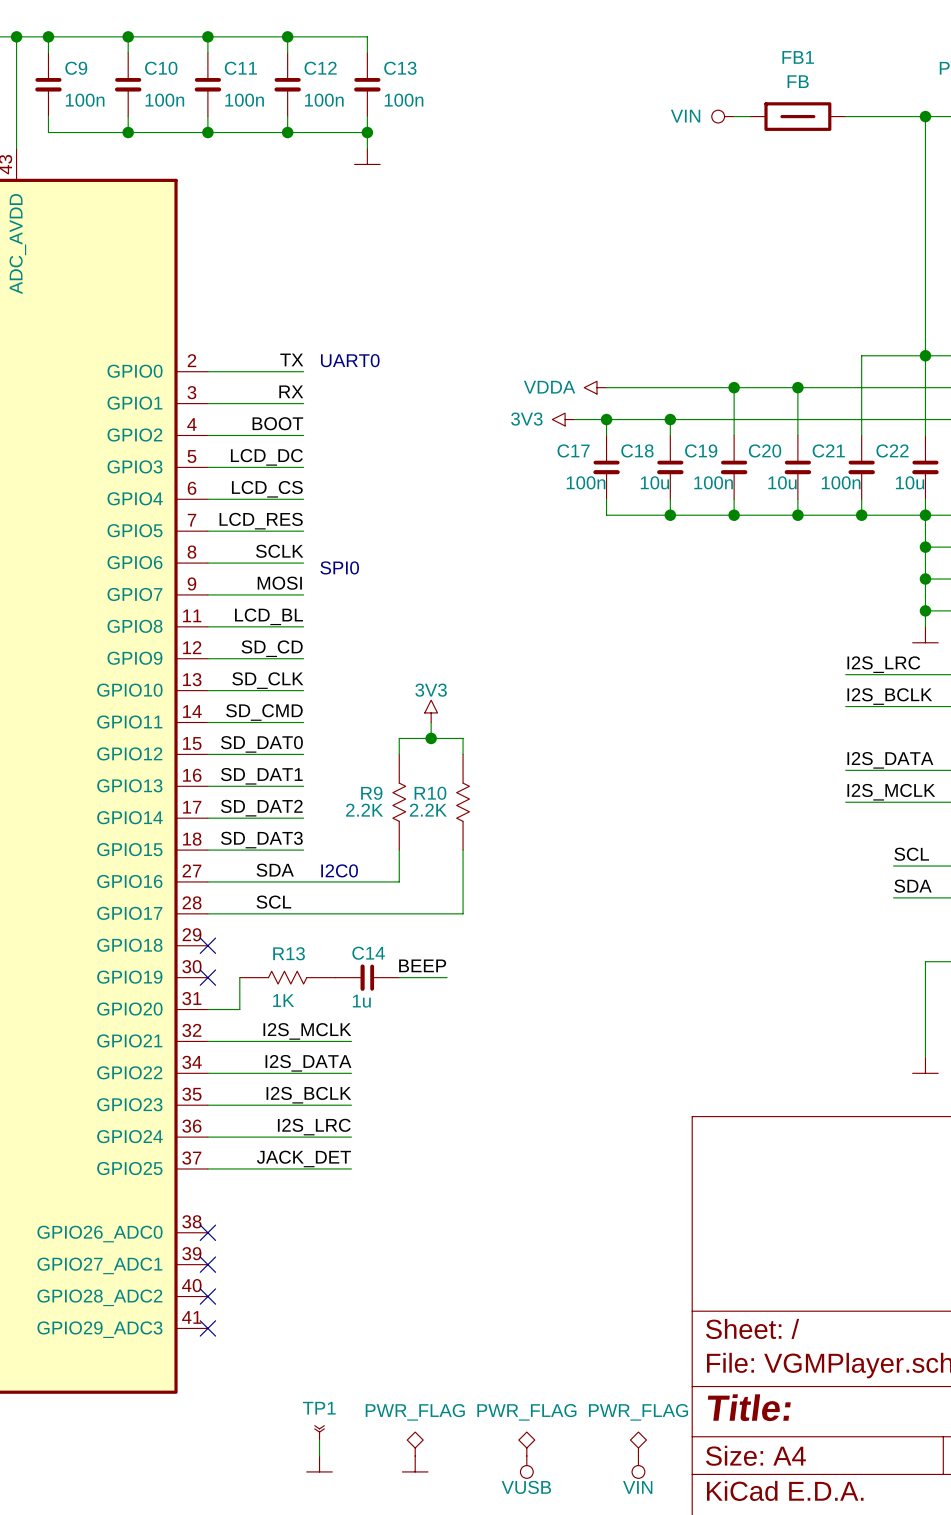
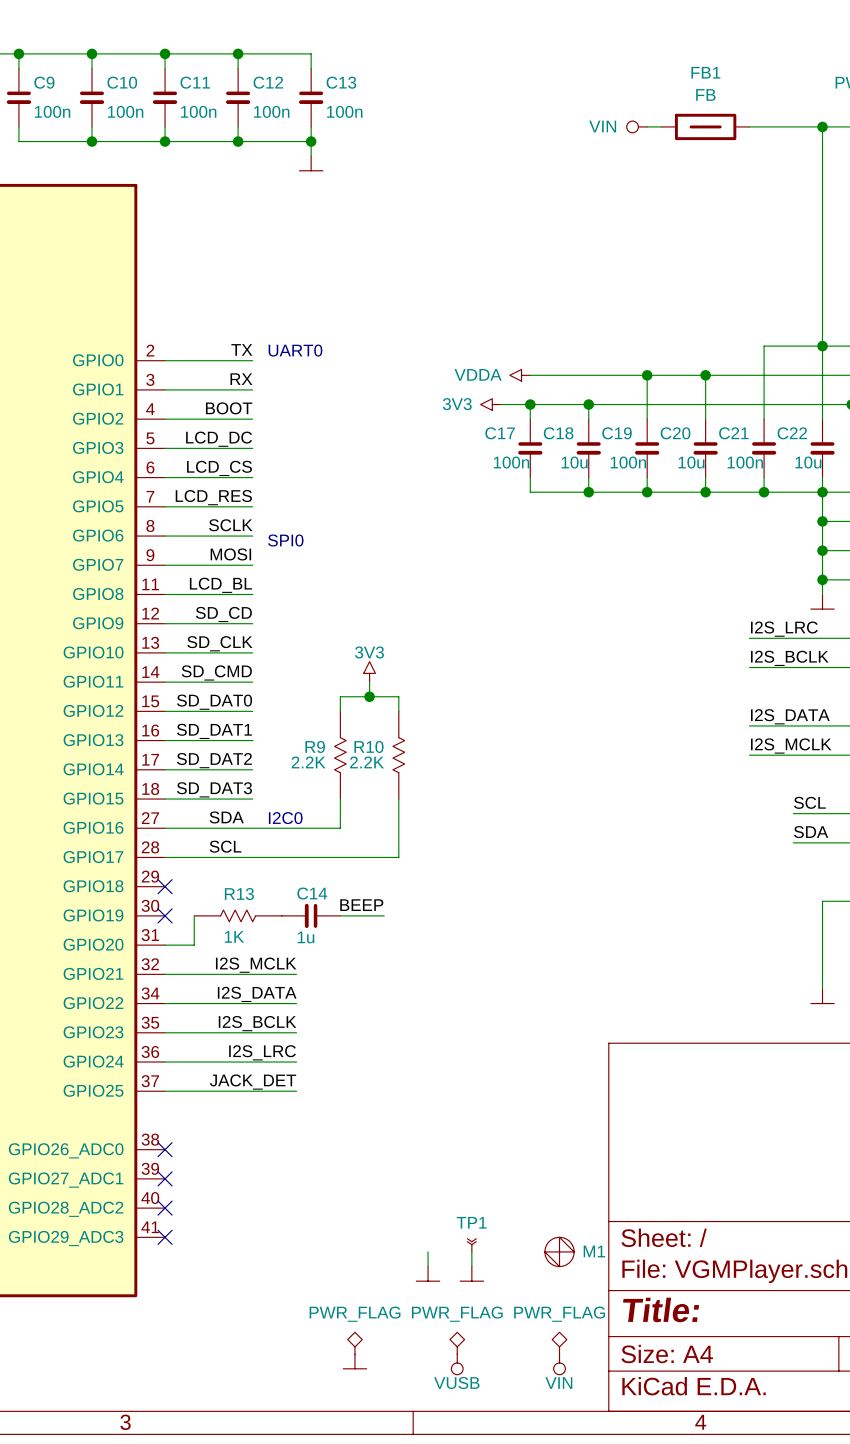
wire: none -> (471, 1251) (471, 1266)
M1: none -> (559, 1251)
power symbol: none -> (428, 1273)
power symbol: none -> (471, 1273)
TP1 position: (319, 1432) -> (471, 1245)
wire: (319, 1440) (319, 1456) -> (428, 1251) (428, 1266)
power symbol: (319, 1463) -> none

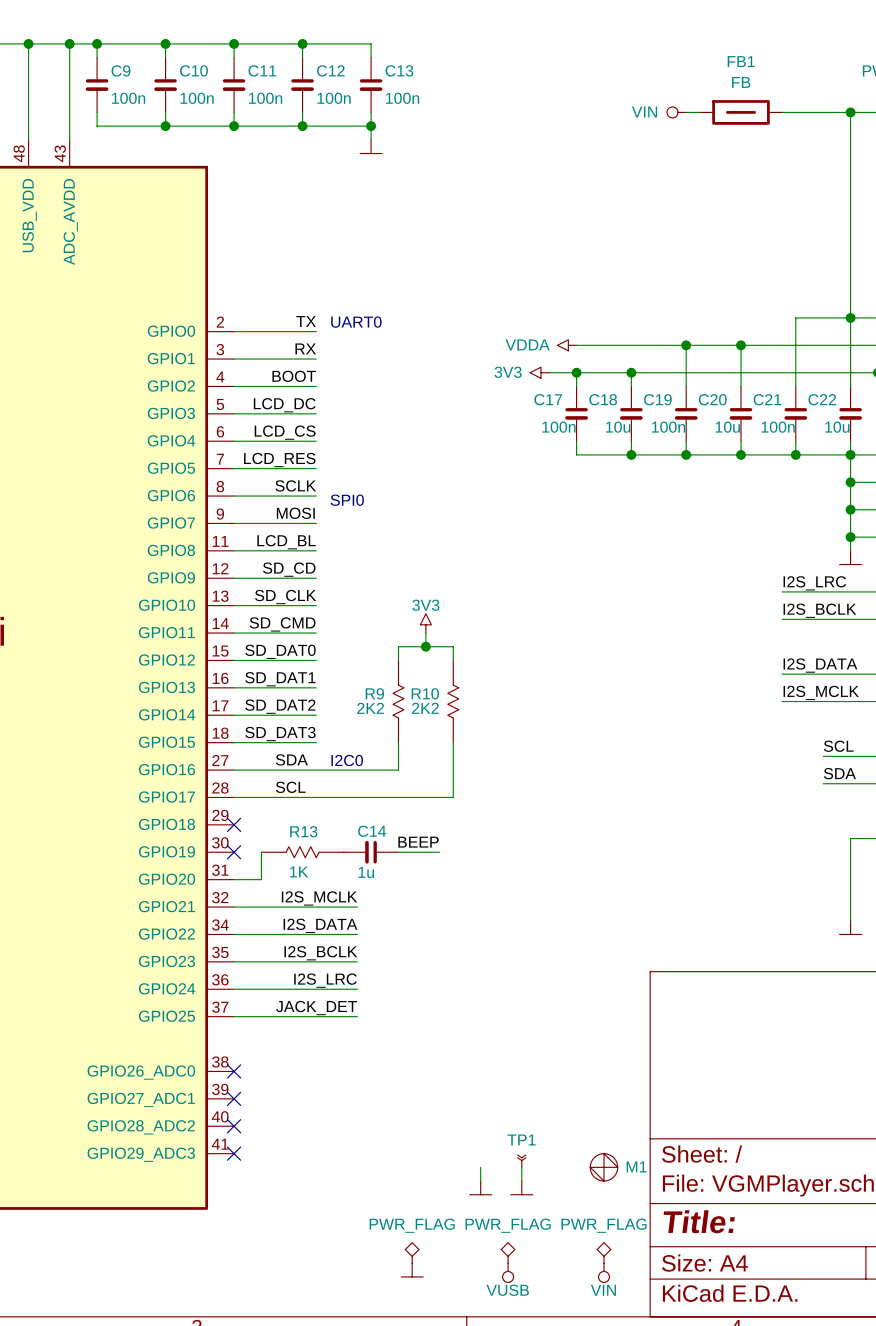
R9 value: 2.2K (308, 762) -> 2K2 (370, 708)
R10 value: 2.2K (367, 762) -> 2K2 (425, 708)

